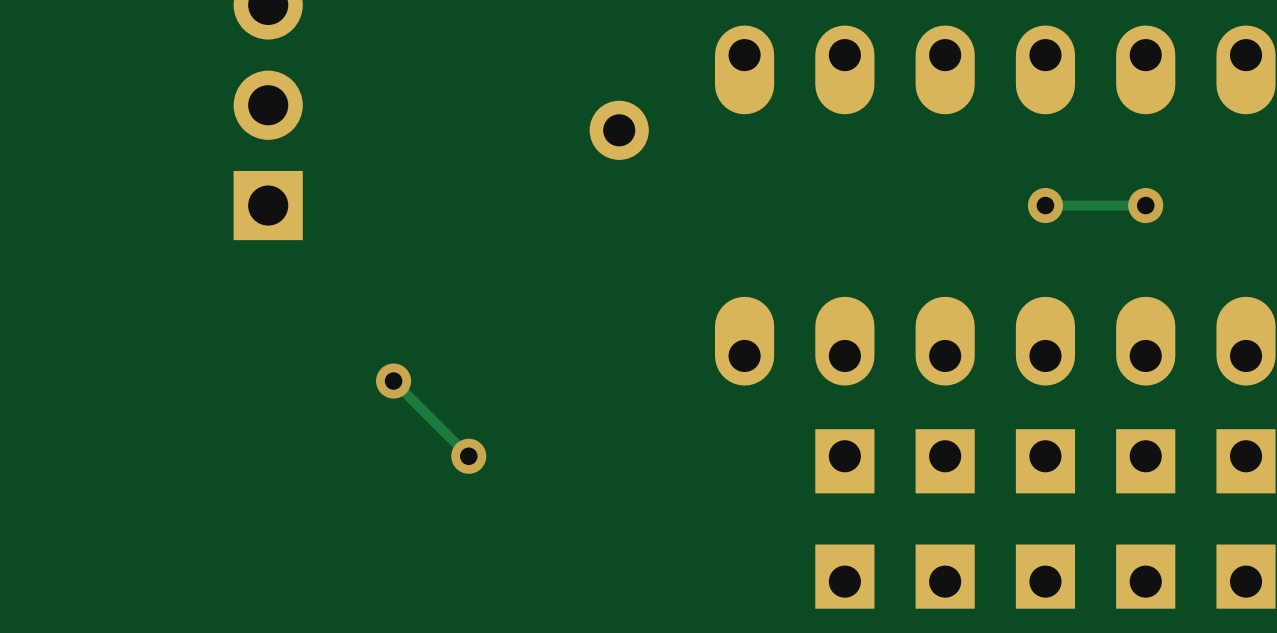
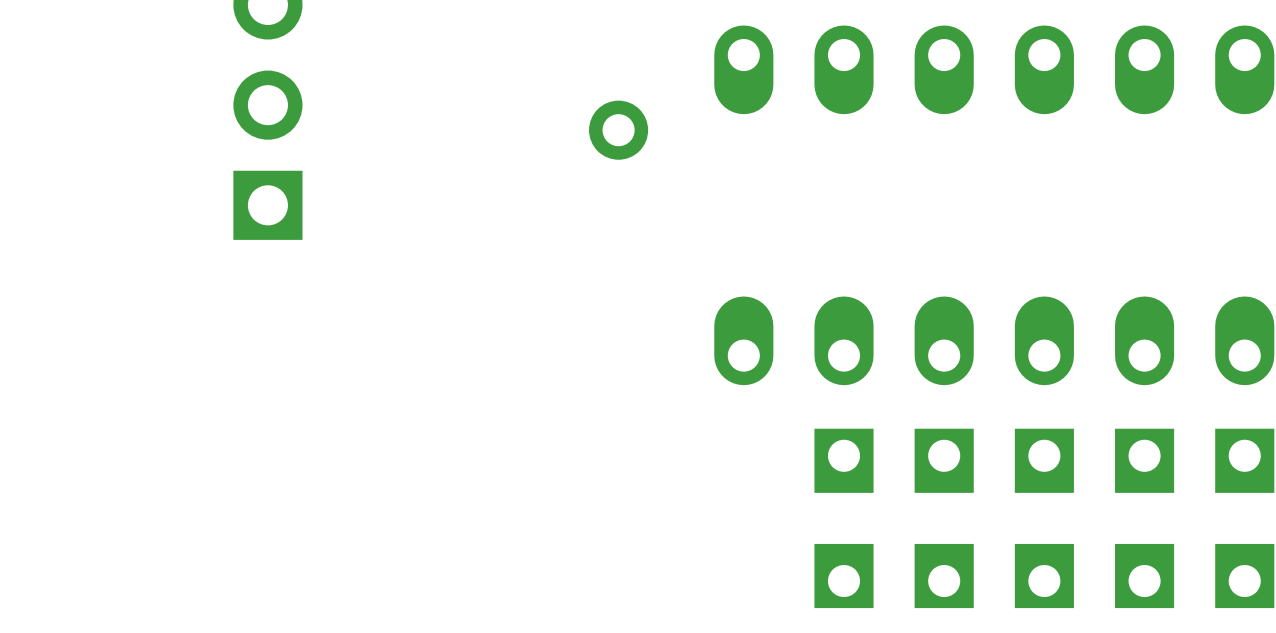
via: (1045, 205) -> none
track: (1145, 205) (1045, 205) -> none
via: (1145, 205) -> none
track: (393, 381) (468, 456) -> none
via: (393, 381) -> none
via: (468, 456) -> none

